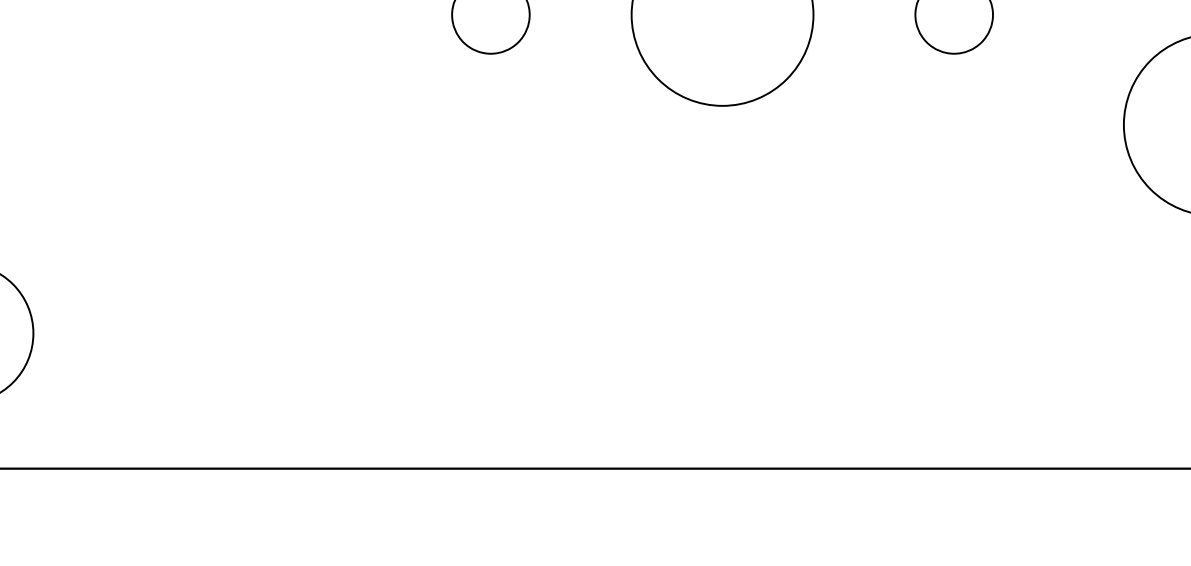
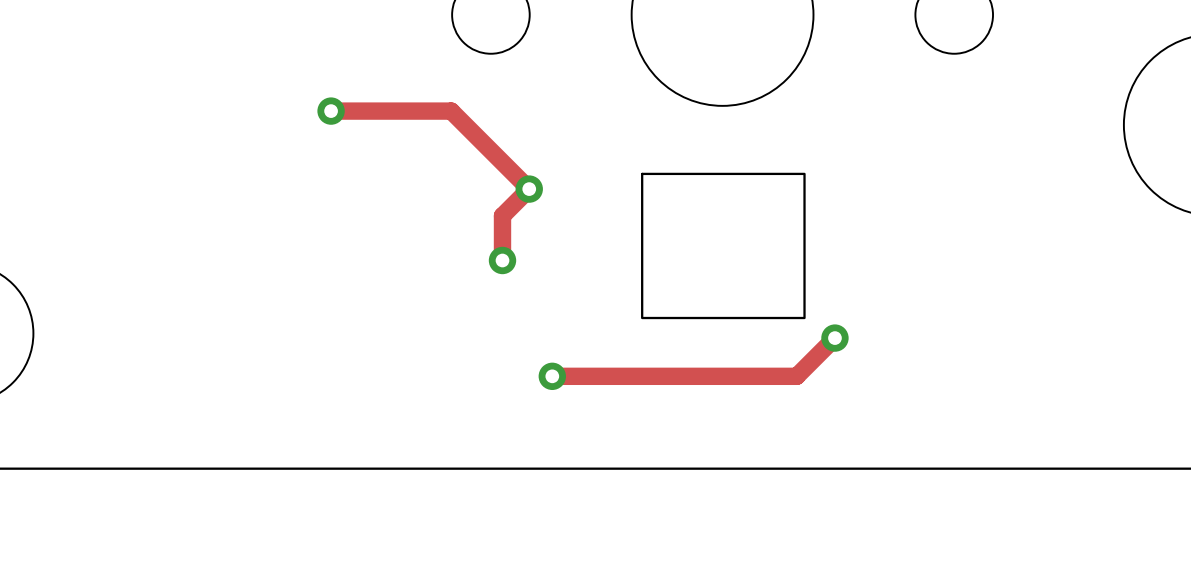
track: none -> (331, 111) (451, 111) (529, 189) (502, 215) (502, 260)
via: none -> (331, 111)
via: none -> (529, 189)
part: none -> (723, 245)
via: none -> (502, 260)
track: none -> (834, 338) (796, 376) (552, 376)
via: none -> (834, 338)
via: none -> (552, 376)

